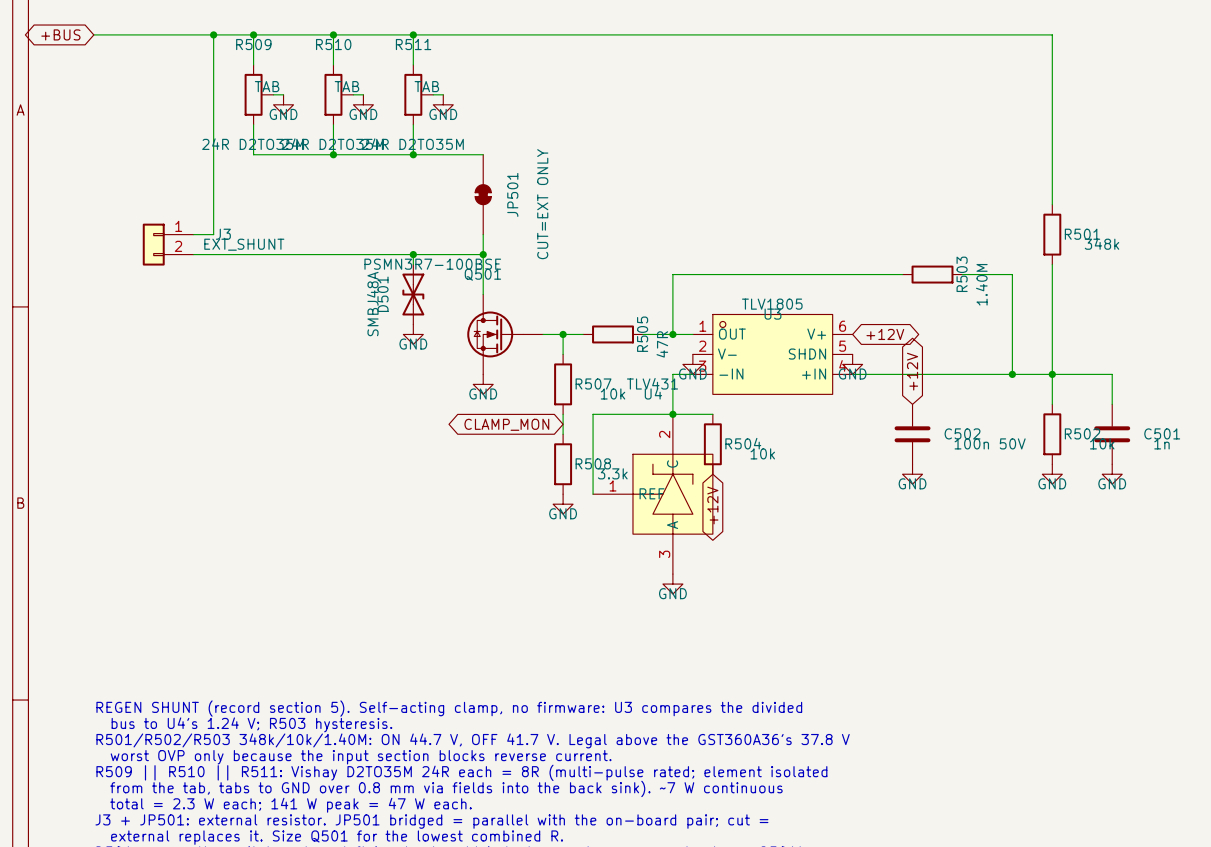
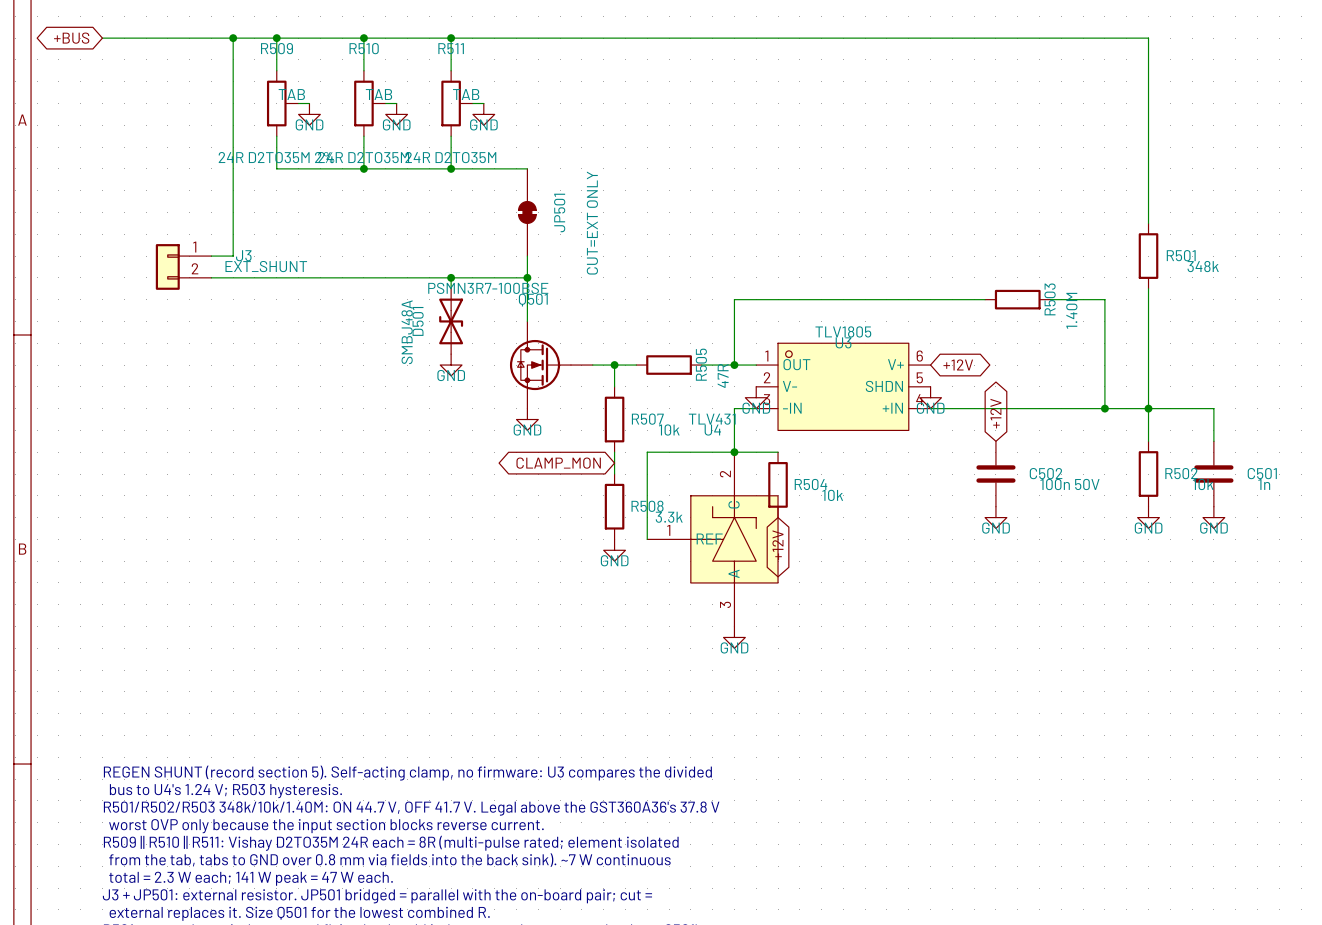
R509 value: 24R D2TO35M (253, 144) -> 24R D2TO35M 2% (276, 157)

